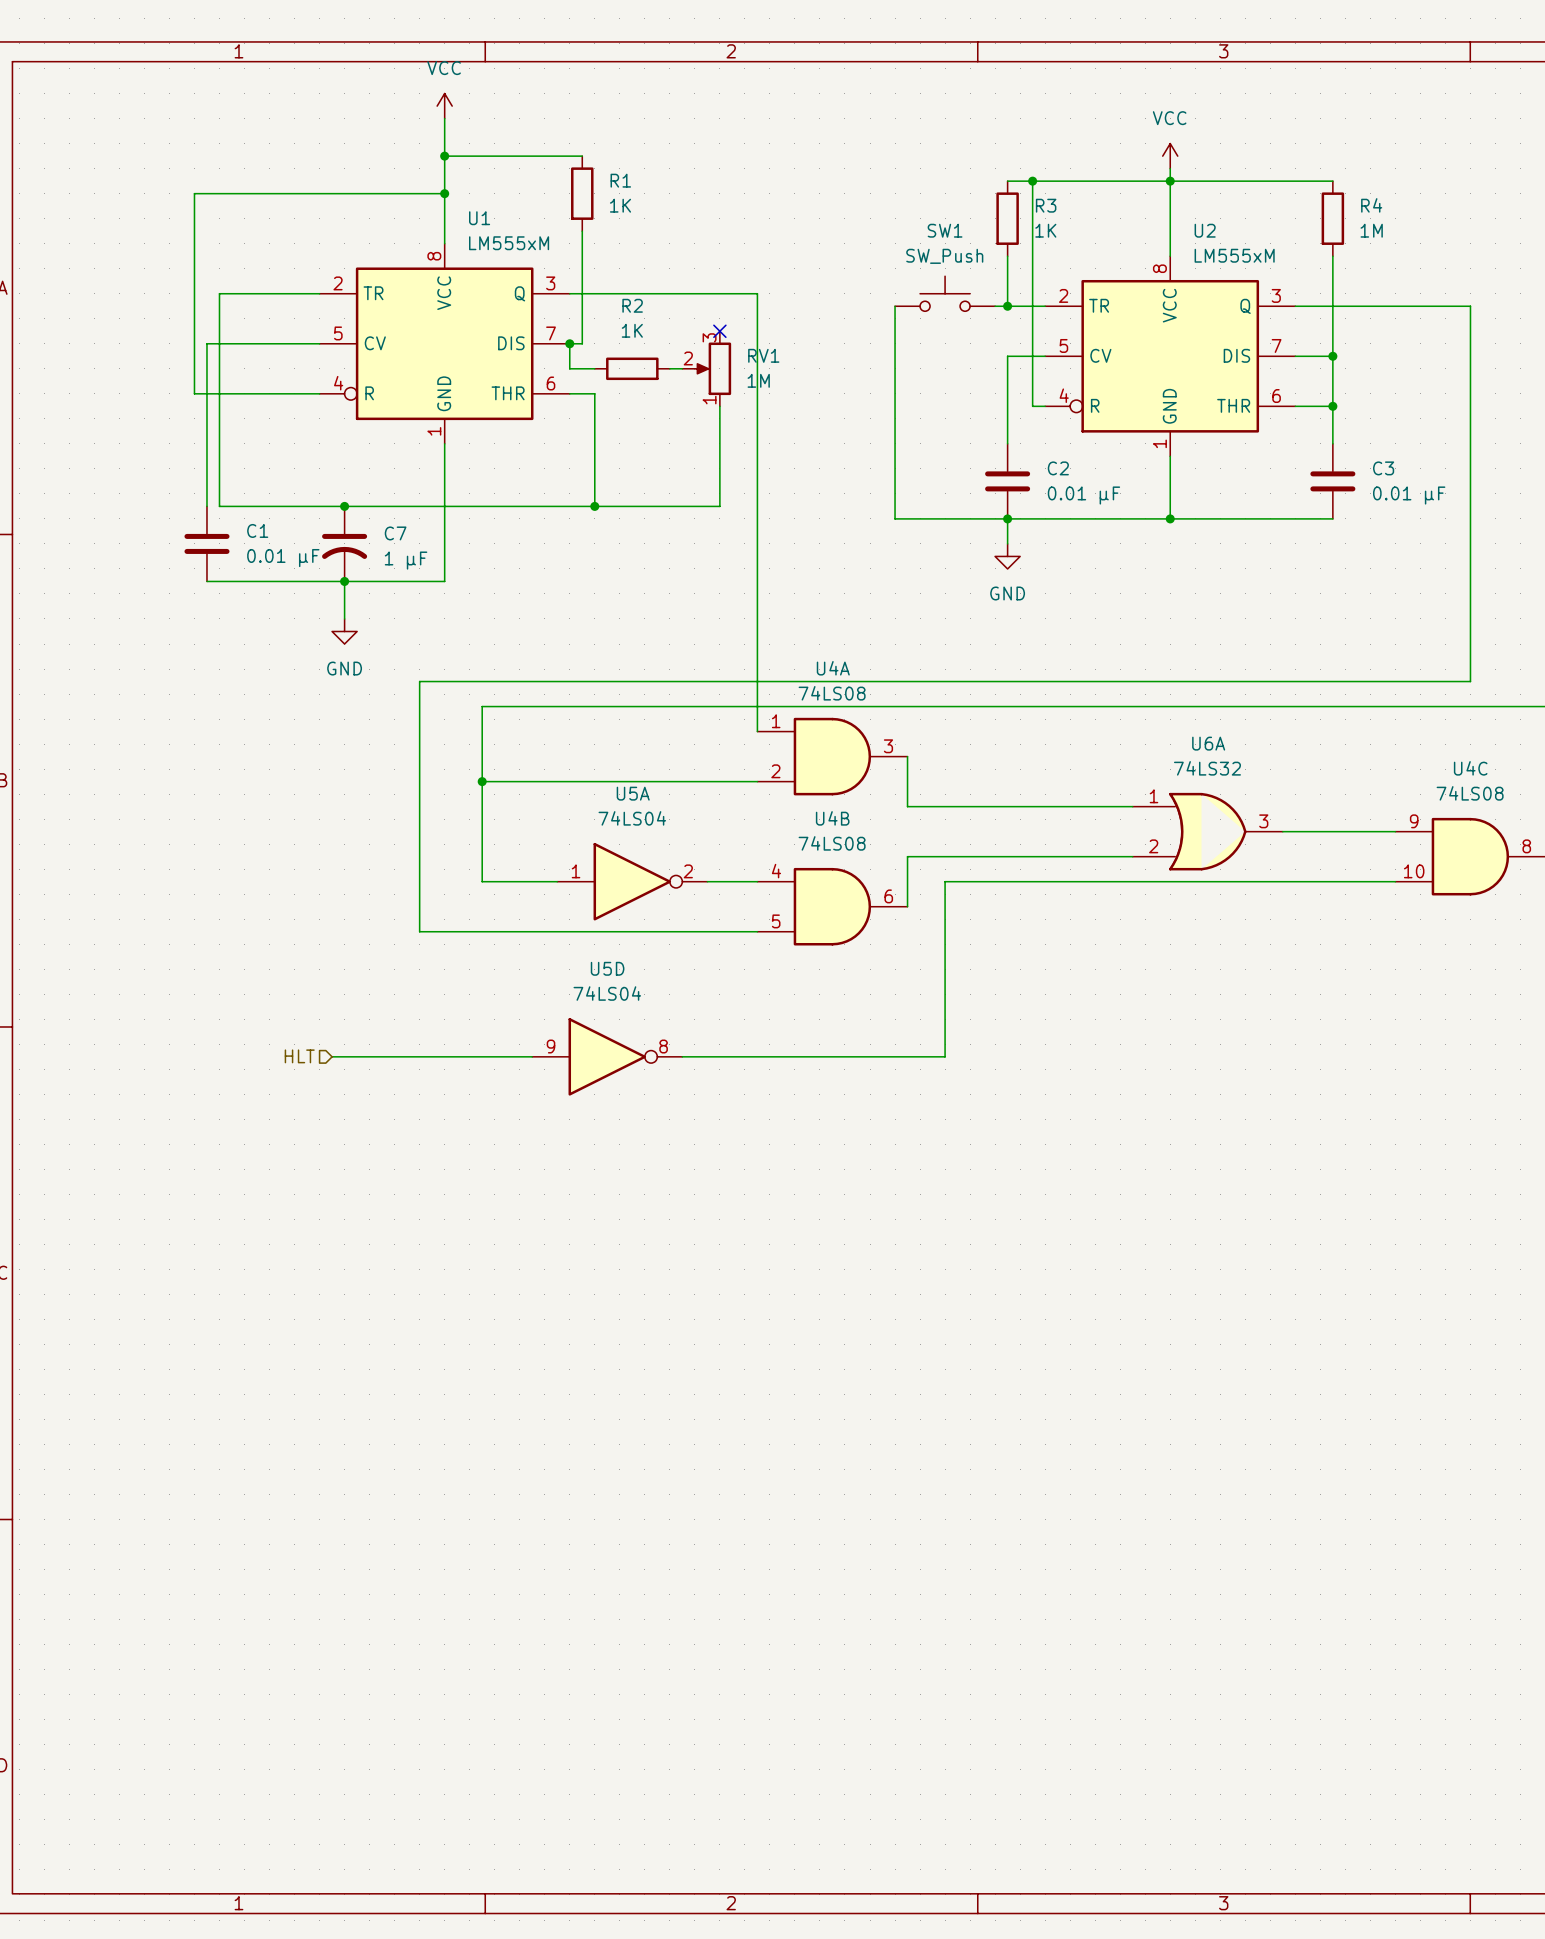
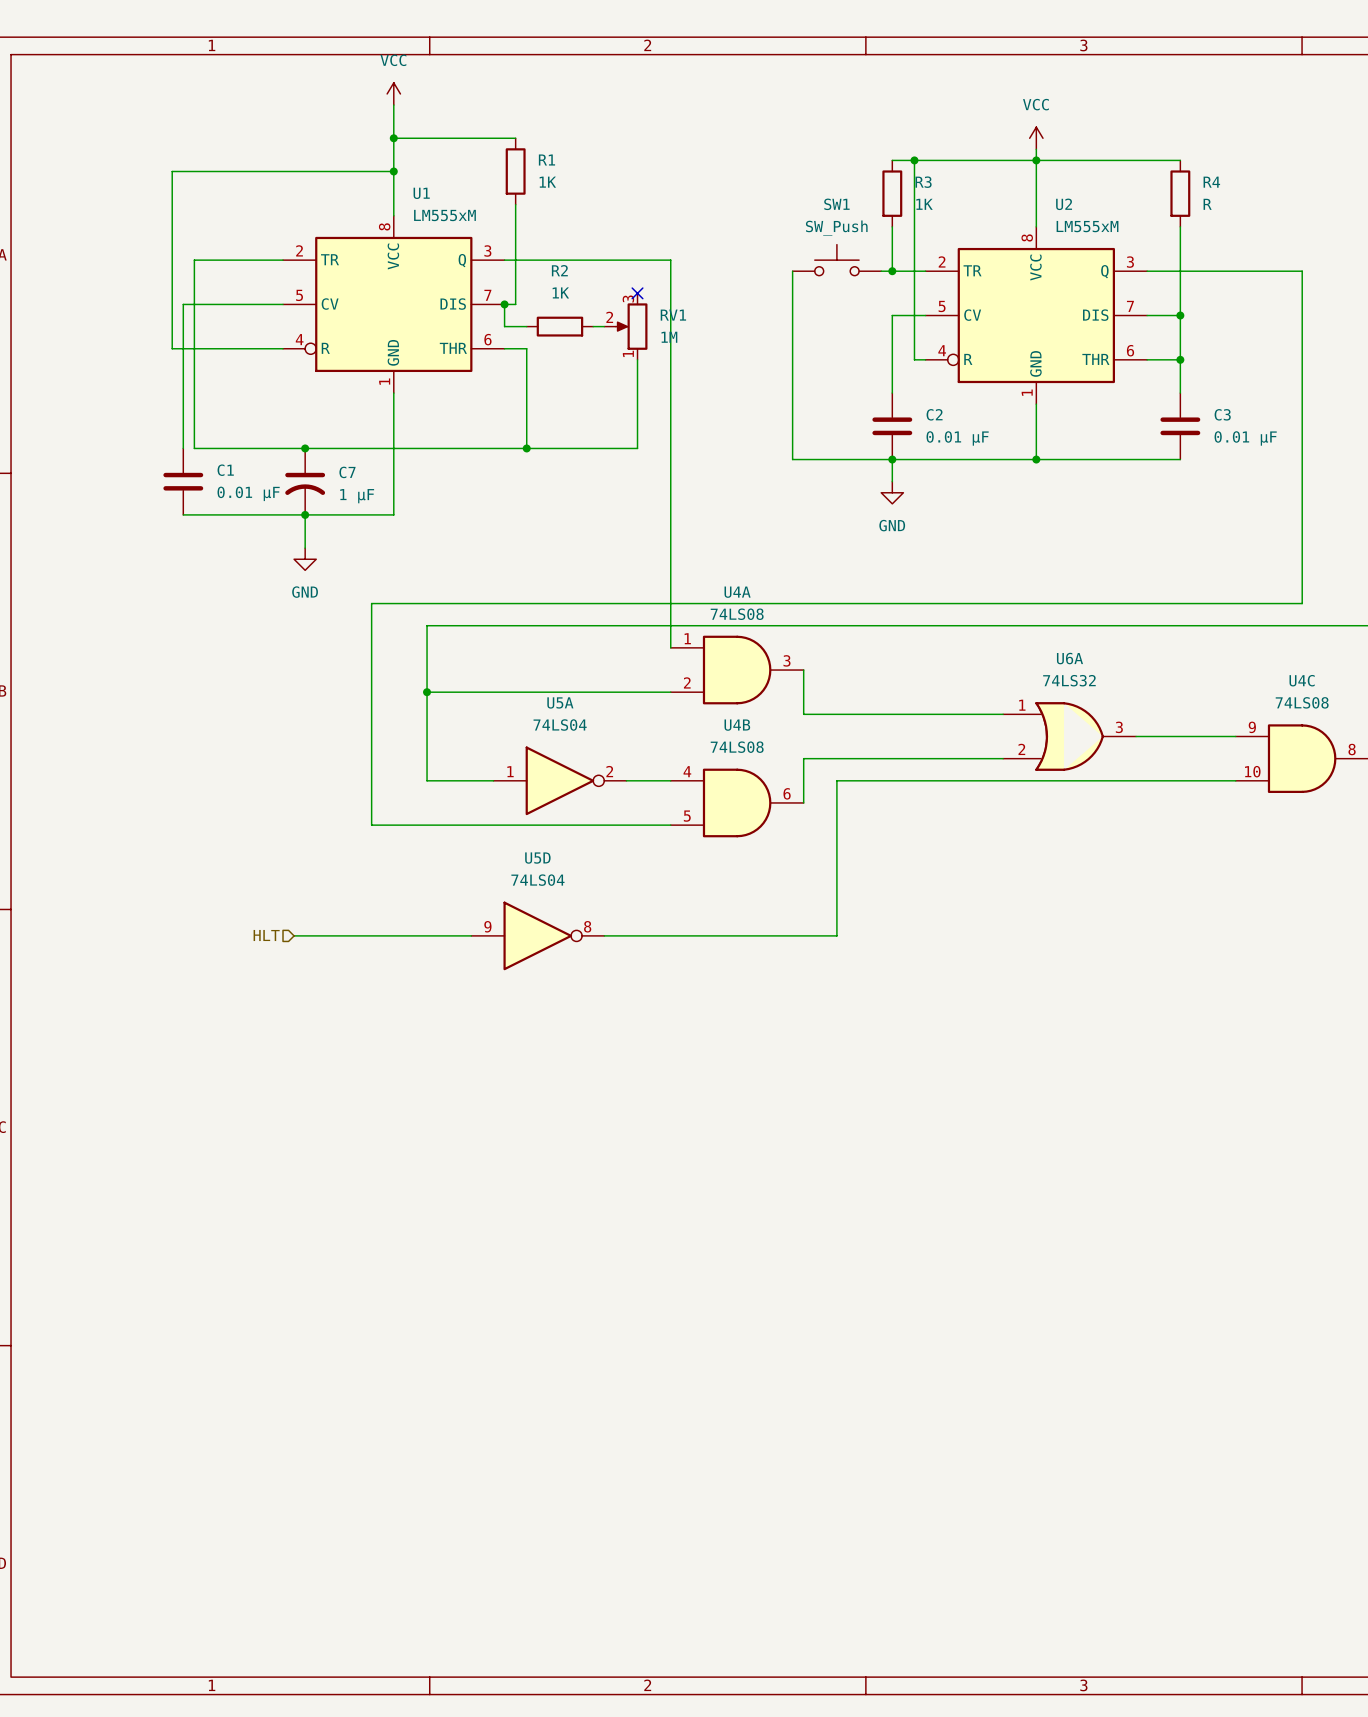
R4 value: 1M (1371, 230) -> R (1207, 204)

